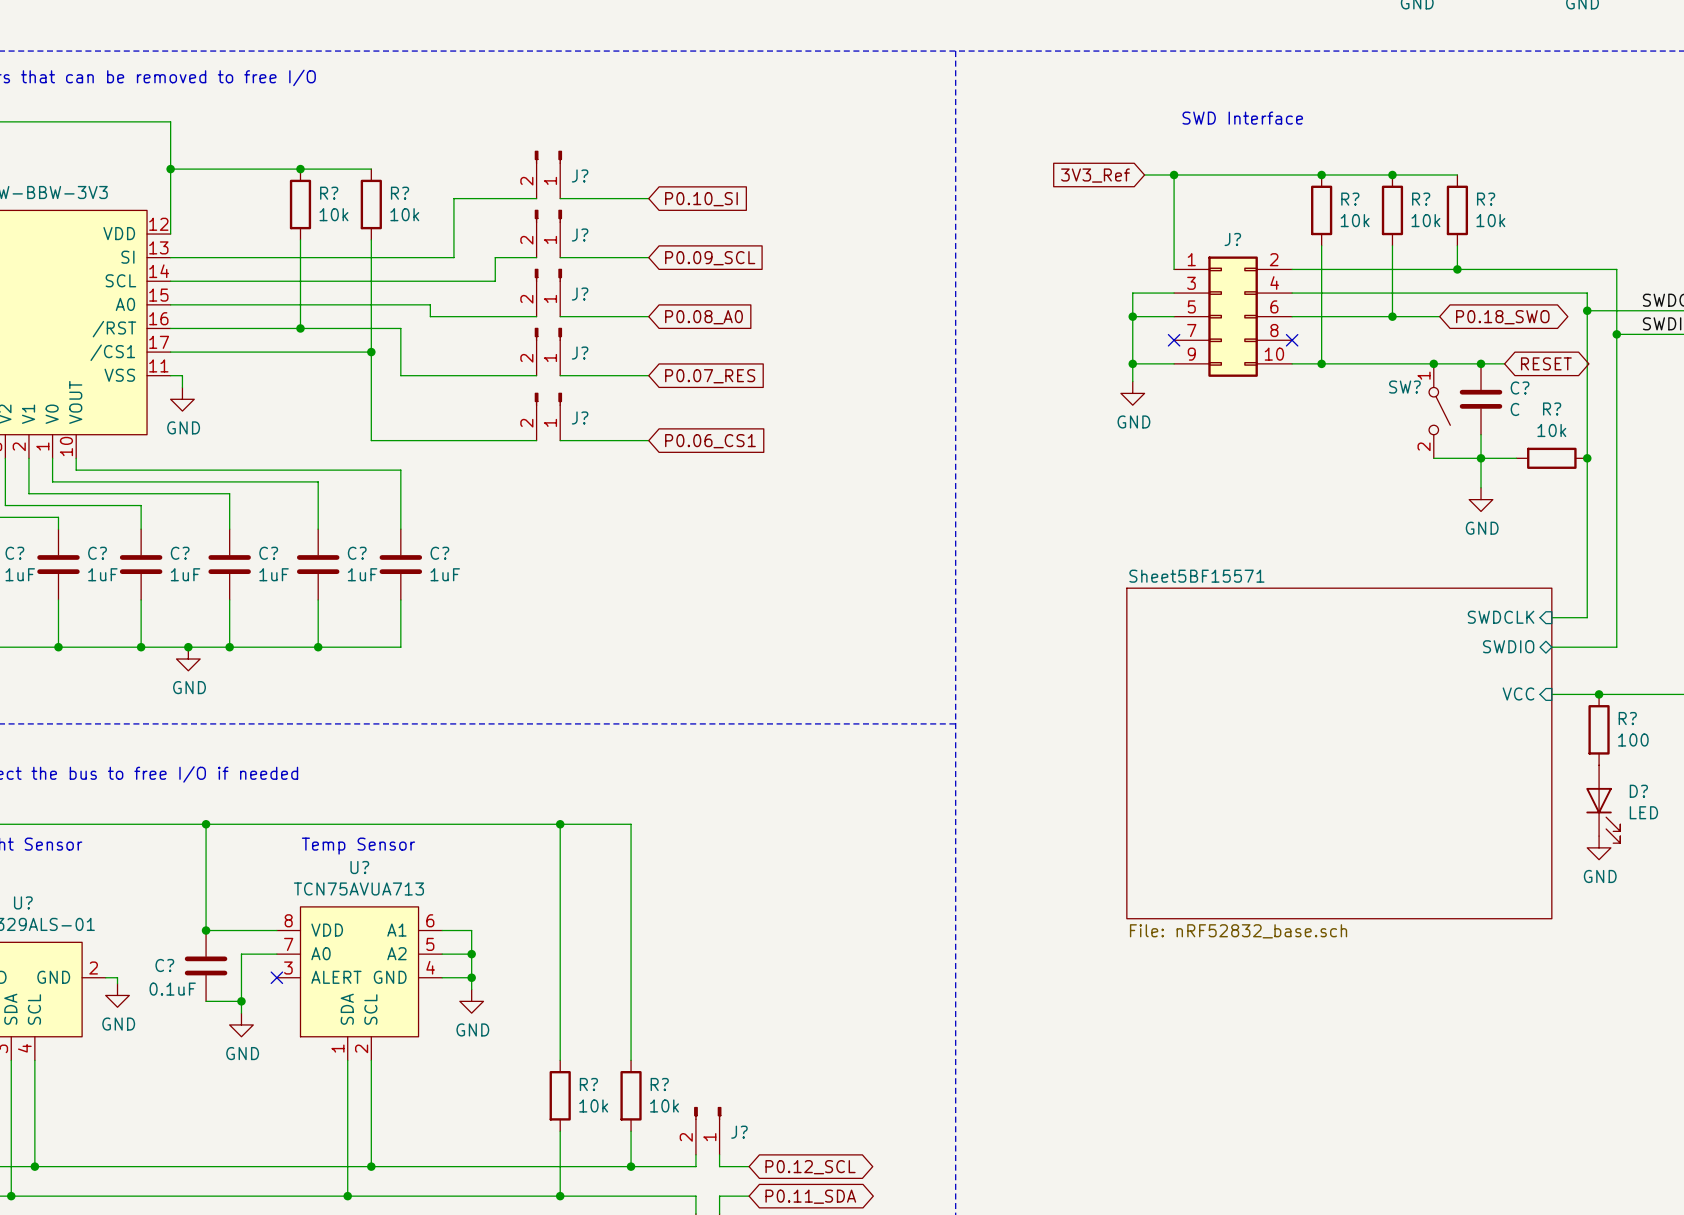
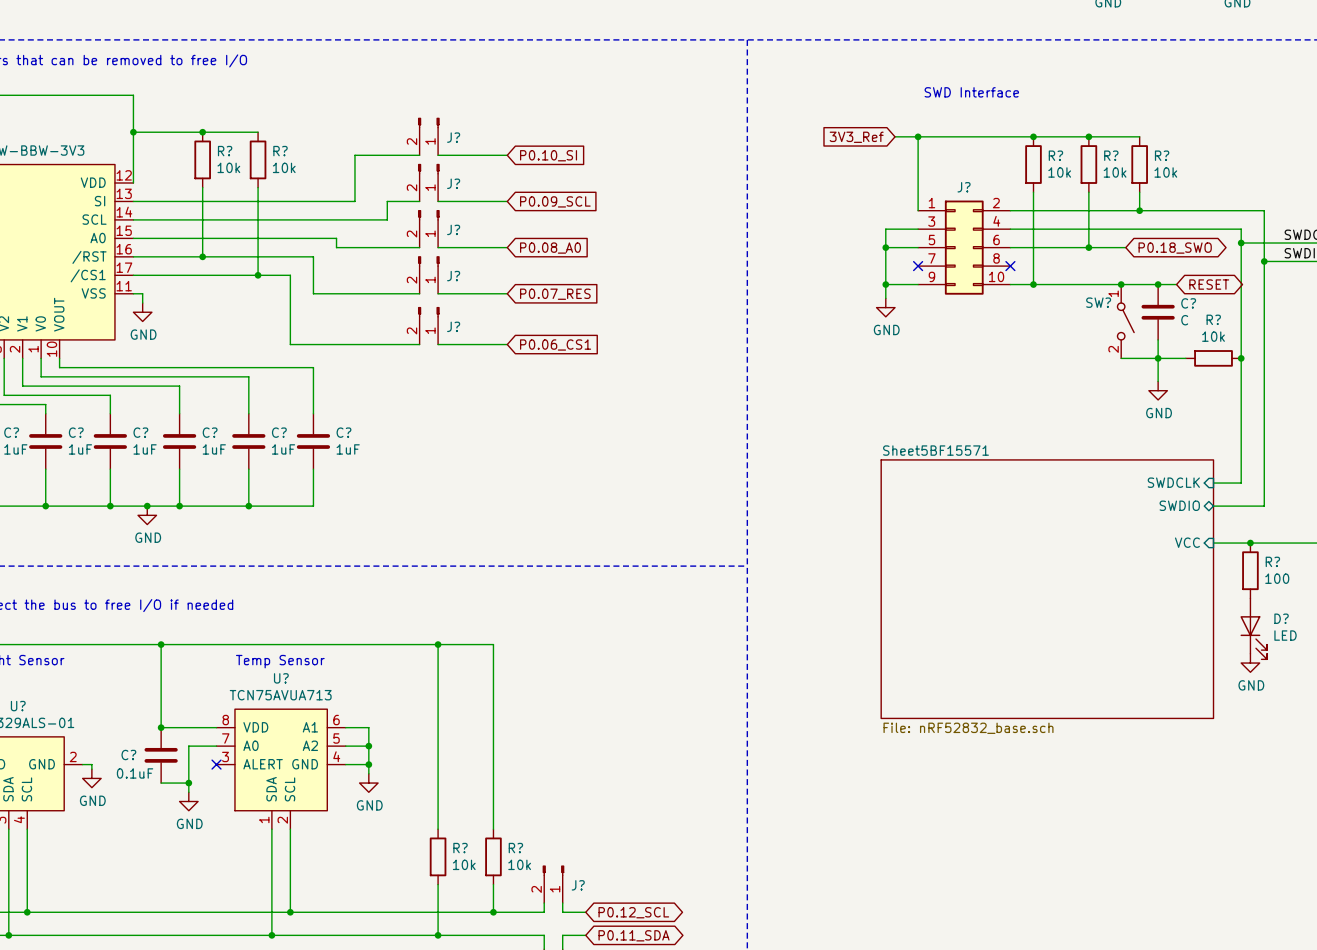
junction position: (300, 169) -> (202, 132)
wire: (330, 169) (371, 169) -> none
R?: none -> 10k (202, 159)
R?: 10k (300, 204) -> none
R?: none -> 10k (258, 159)
R?: 10k (371, 204) -> none
wire: (300, 239) (300, 328) -> (202, 187) (202, 256)
wire: (371, 239) (371, 352) -> (258, 187) (258, 275)
junction: none -> (202, 256)
junction: (300, 328) -> none
junction: none -> (258, 275)
junction: (371, 352) -> none

